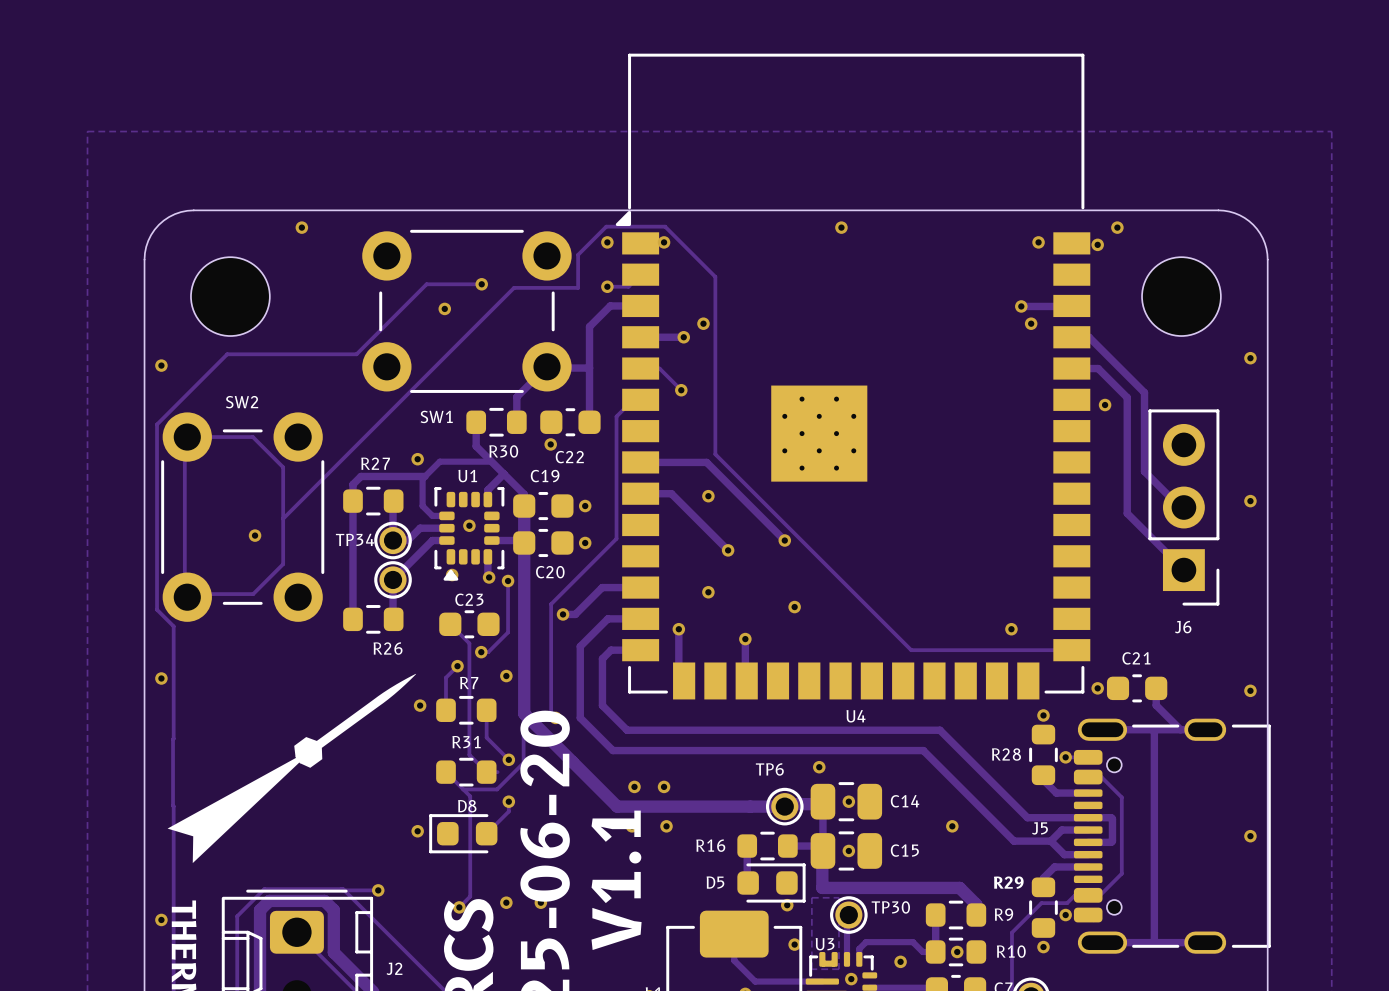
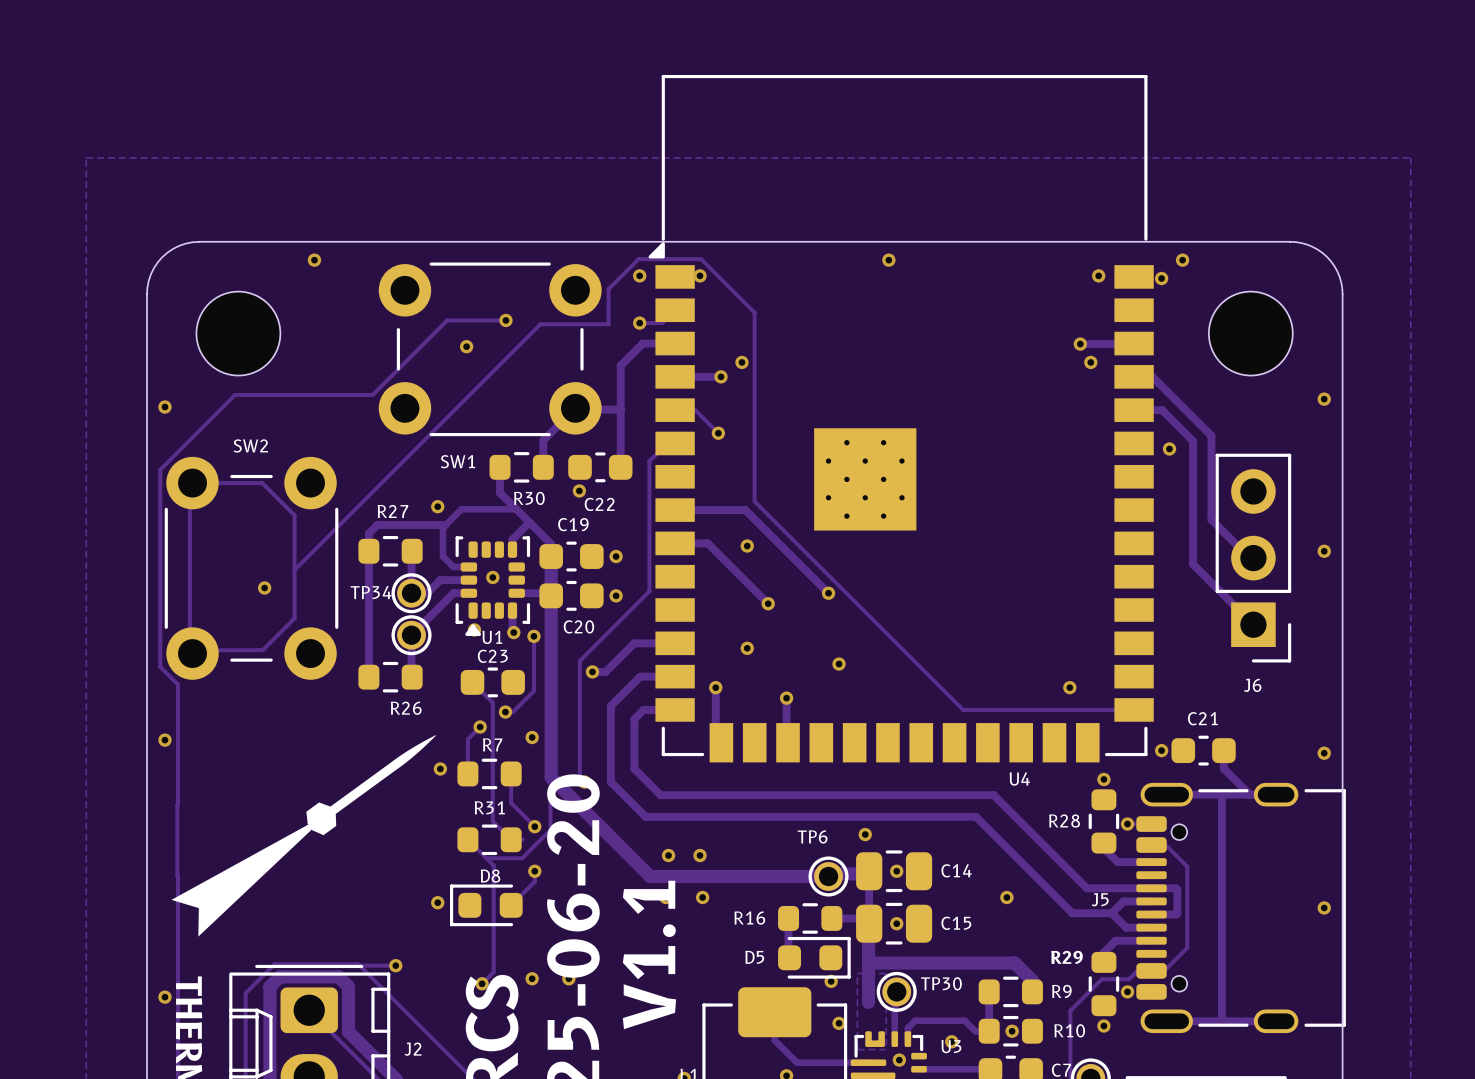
U1 name position: U1 (467, 476) -> U1 (492, 637)
U4 name position: U4 (856, 716) -> U4 (1019, 779)
track: none -> (868, 963) (868, 1002)
U3 name position: U3 (825, 944) -> U3 (951, 1046)

